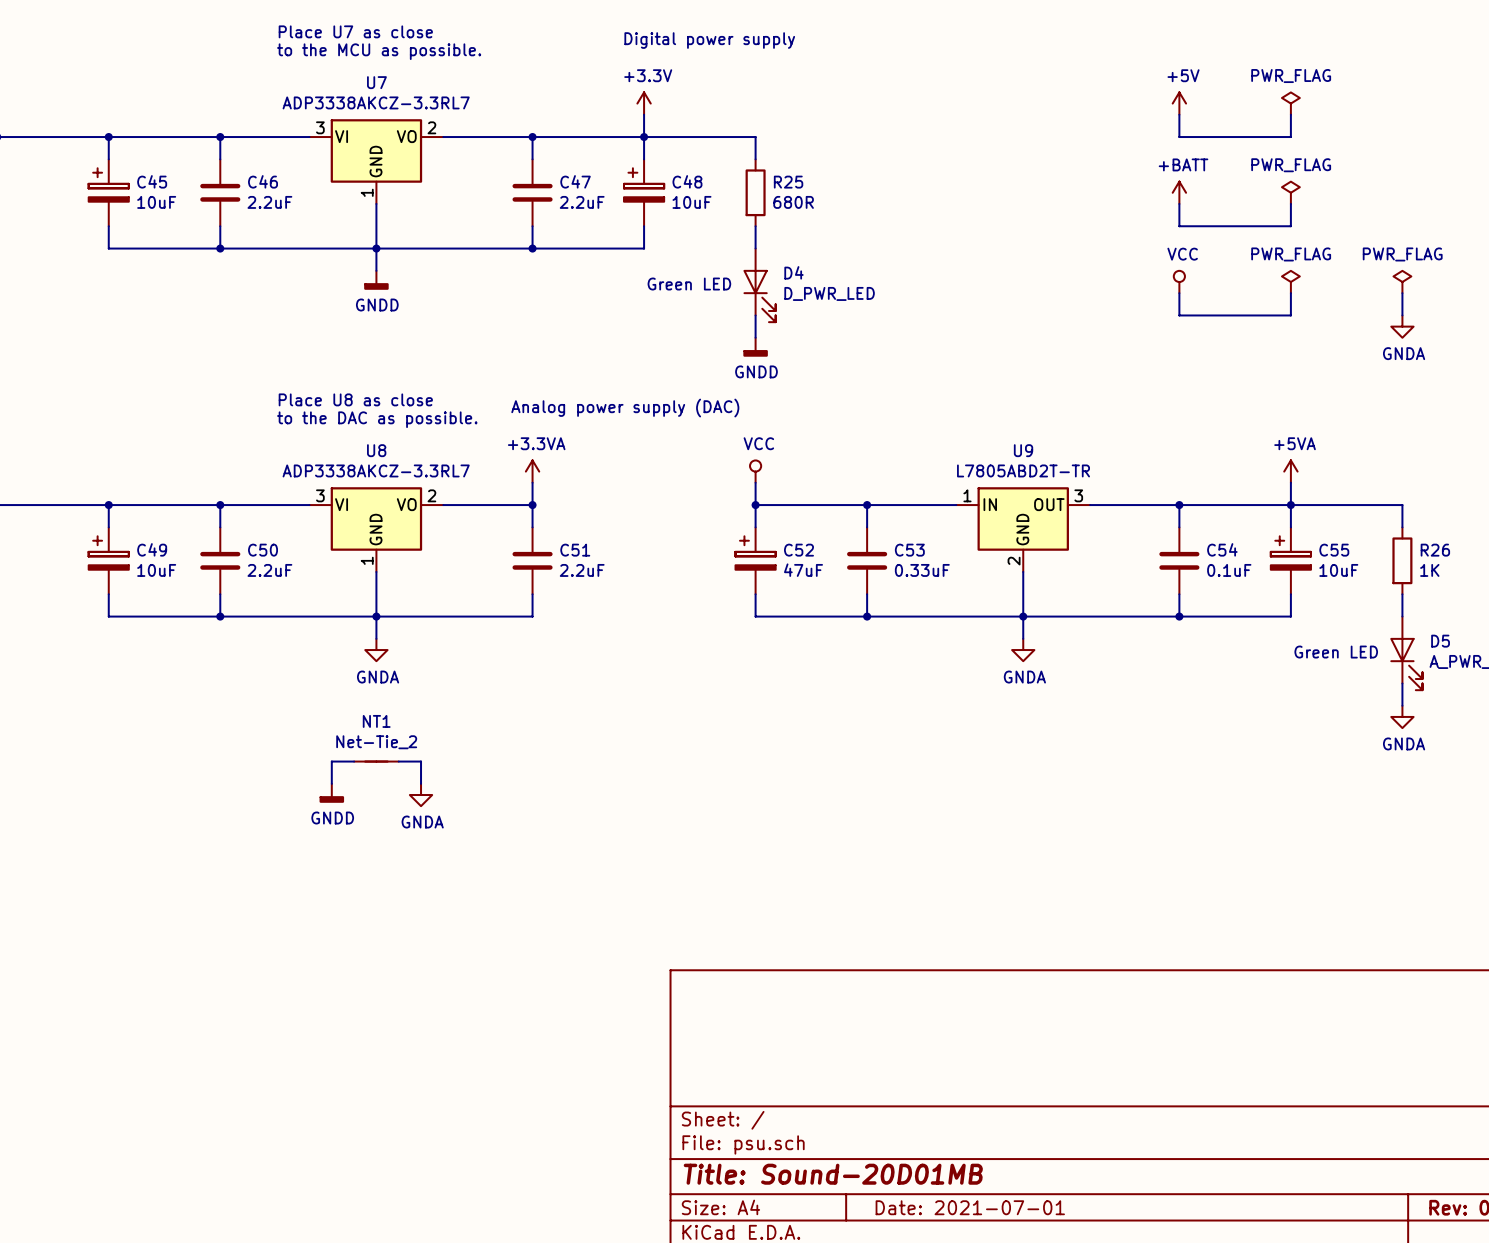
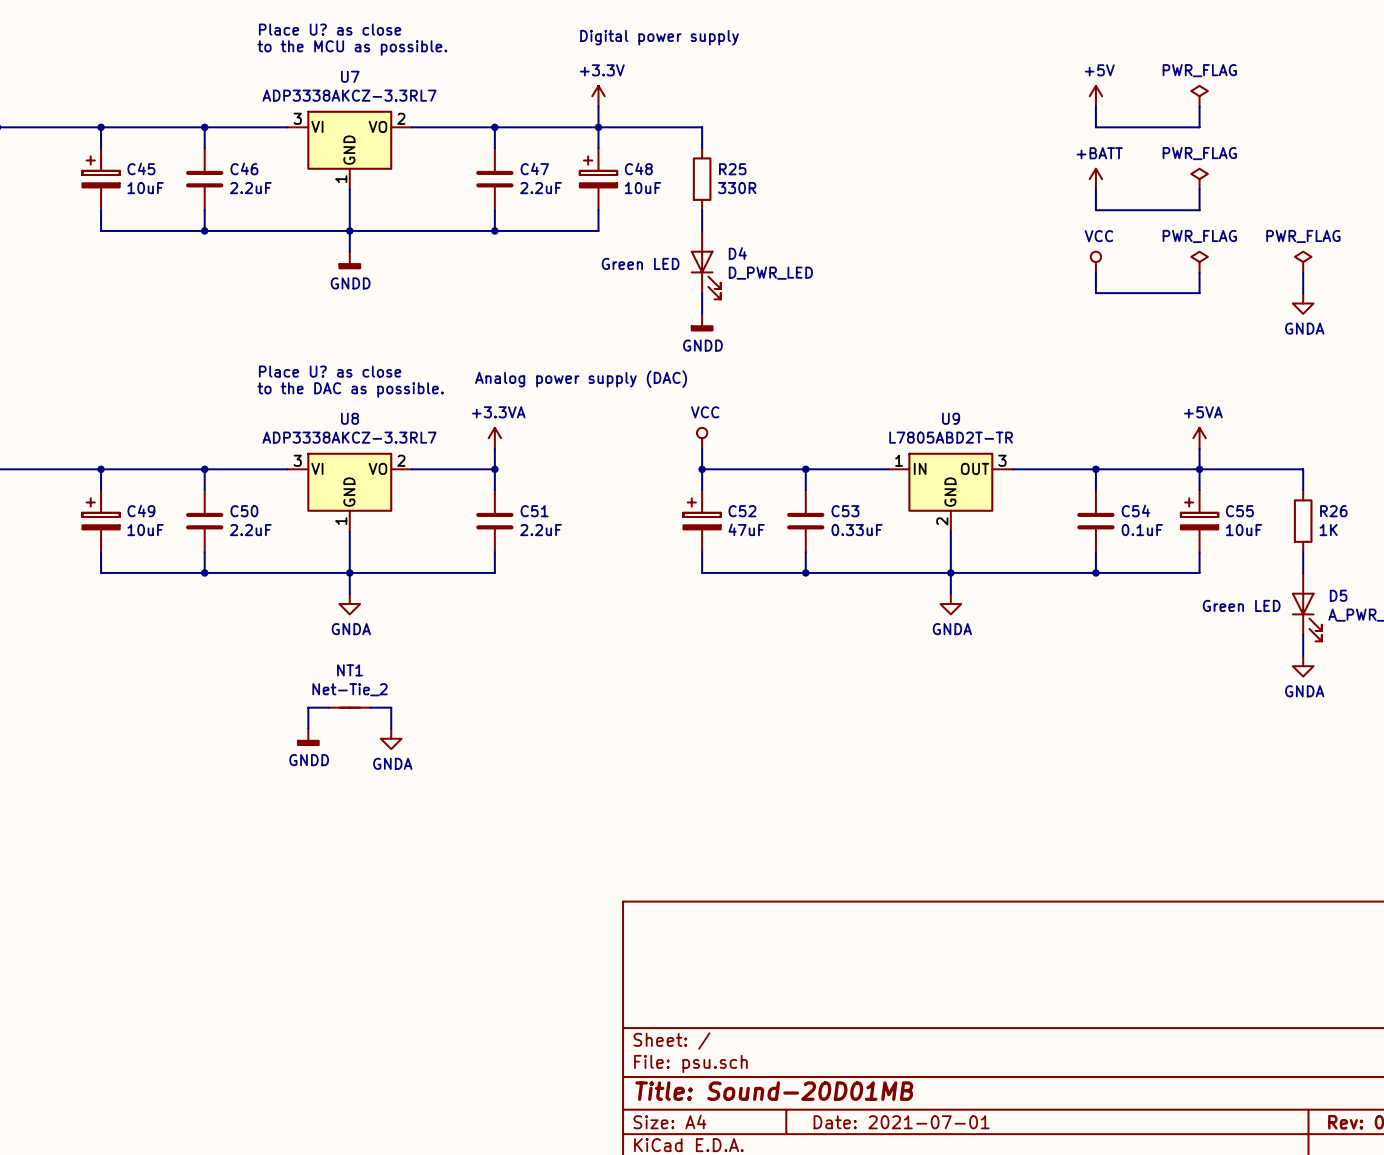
text: Place U7 as close (355, 31) -> Place U? as close (330, 29)
R25 value: 680R (793, 202) -> 330R (737, 188)
text: Place U8 as close (355, 399) -> Place U? as close (330, 371)

